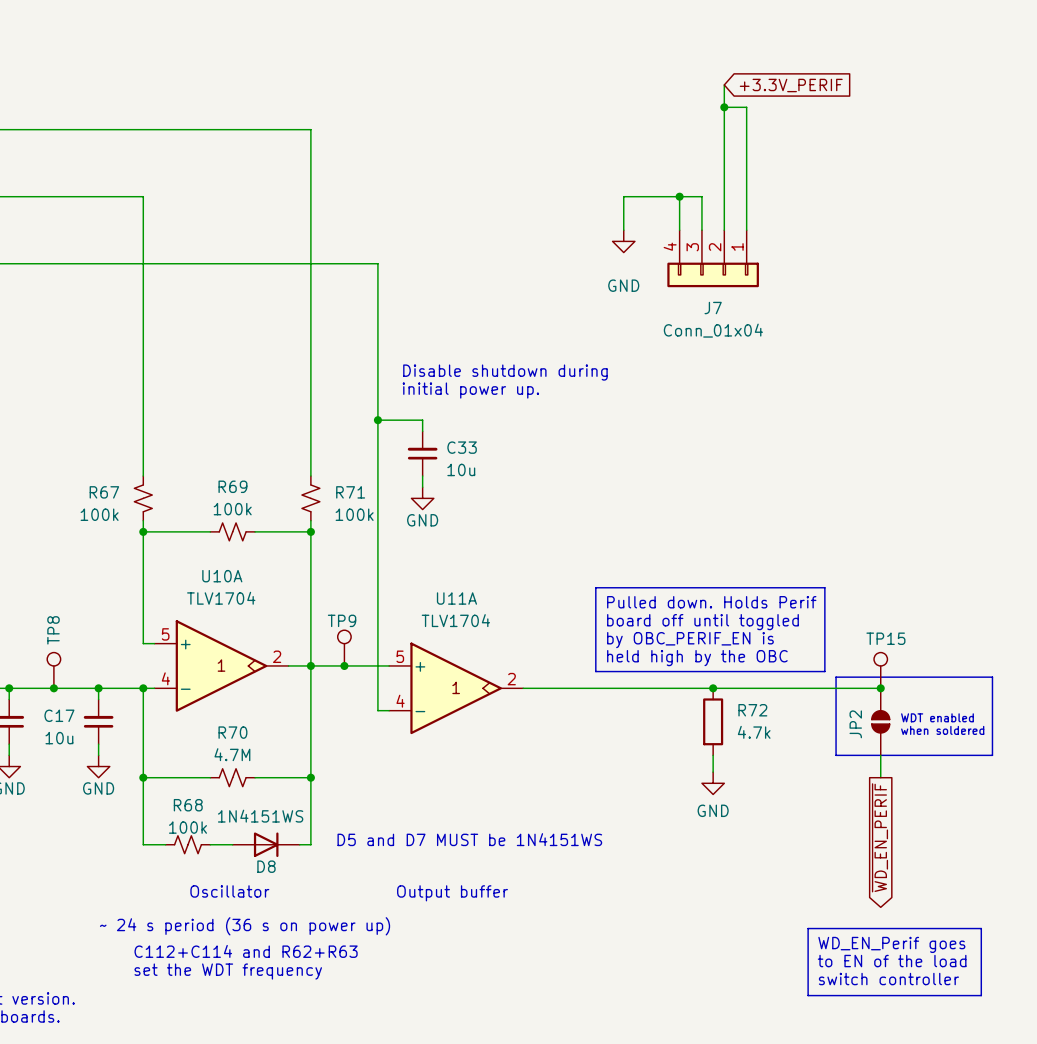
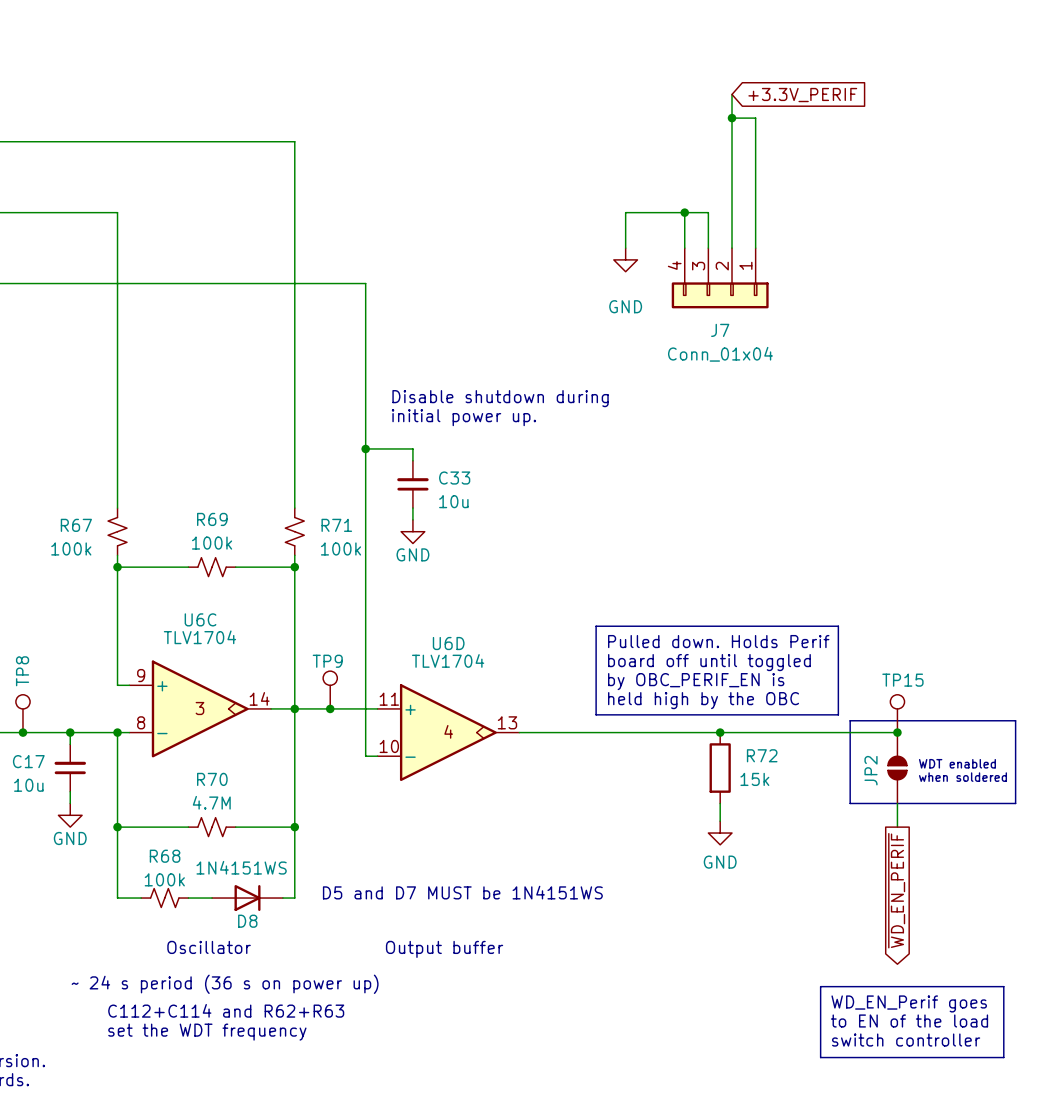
U10A name: U10A (222, 576) -> U6C (200, 619)
U11A name: U11A (456, 598) -> U6D (448, 643)
U10A pin number: 5 (165, 634) -> 9 (141, 675)
U10A pin number: 2 (277, 656) -> 14 (259, 698)
U11A pin number: 5 (400, 656) -> 11 (389, 699)
U10A text: 1 (221, 665) -> 3 (199, 708)
U10A pin number: 4 (165, 678) -> 8 (141, 722)
U11A pin number: 2 (511, 679) -> 13 (507, 722)
U11A text: 1 (456, 687) -> 4 (448, 731)
U11A pin number: 4 (400, 701) -> 10 (389, 746)
R72 value: 4.7k (754, 732) -> 15k (754, 779)

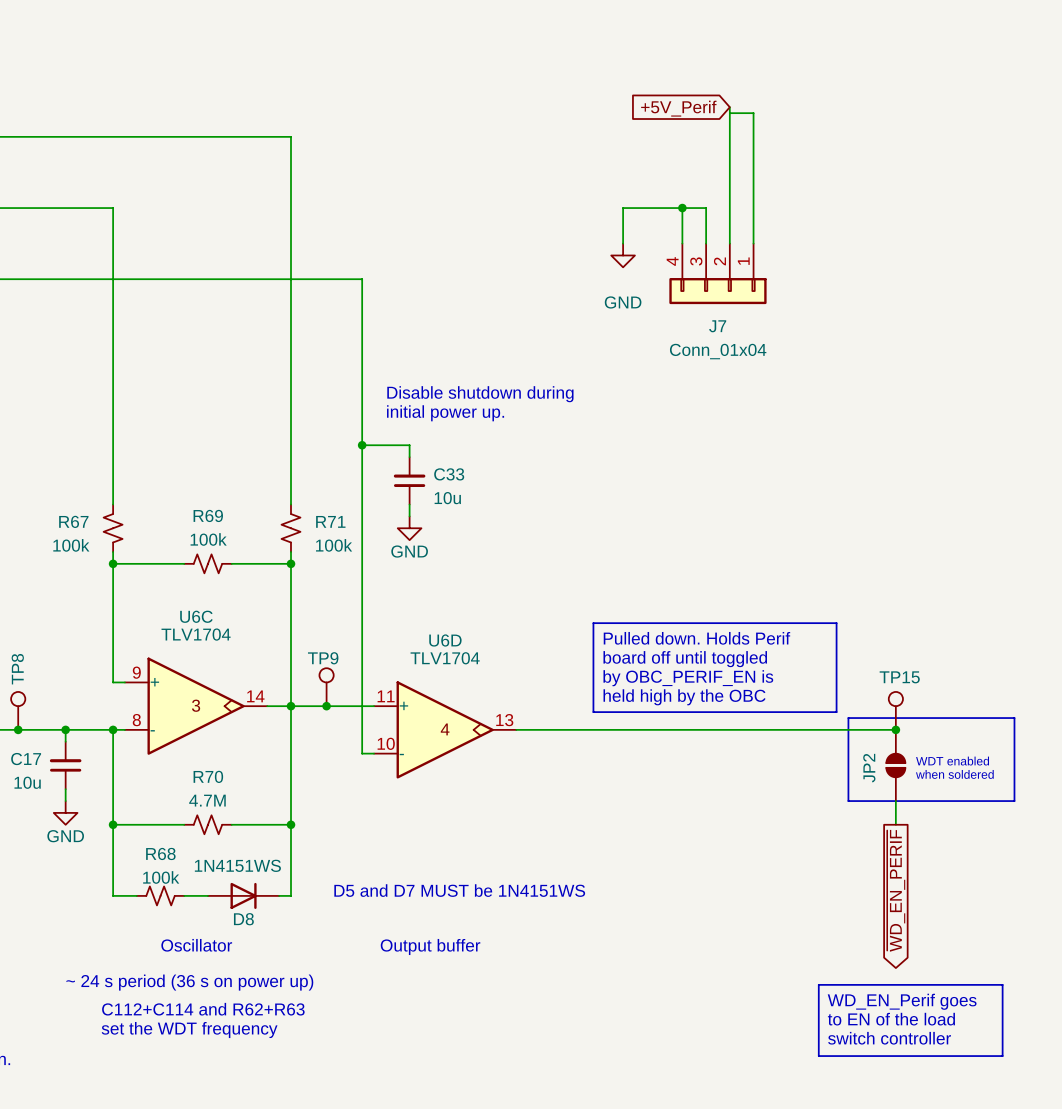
wire: (732, 94) (732, 112) -> none
global label: +3.3V_PERIF (802, 95) -> none
global label: none -> +5V_Perif (678, 108)
junction: (732, 118) -> none
junction: (720, 732) -> none
R72: 15k (720, 768) -> none
wire: (720, 803) (720, 821) -> none
power symbol: GND (720, 833) -> none

